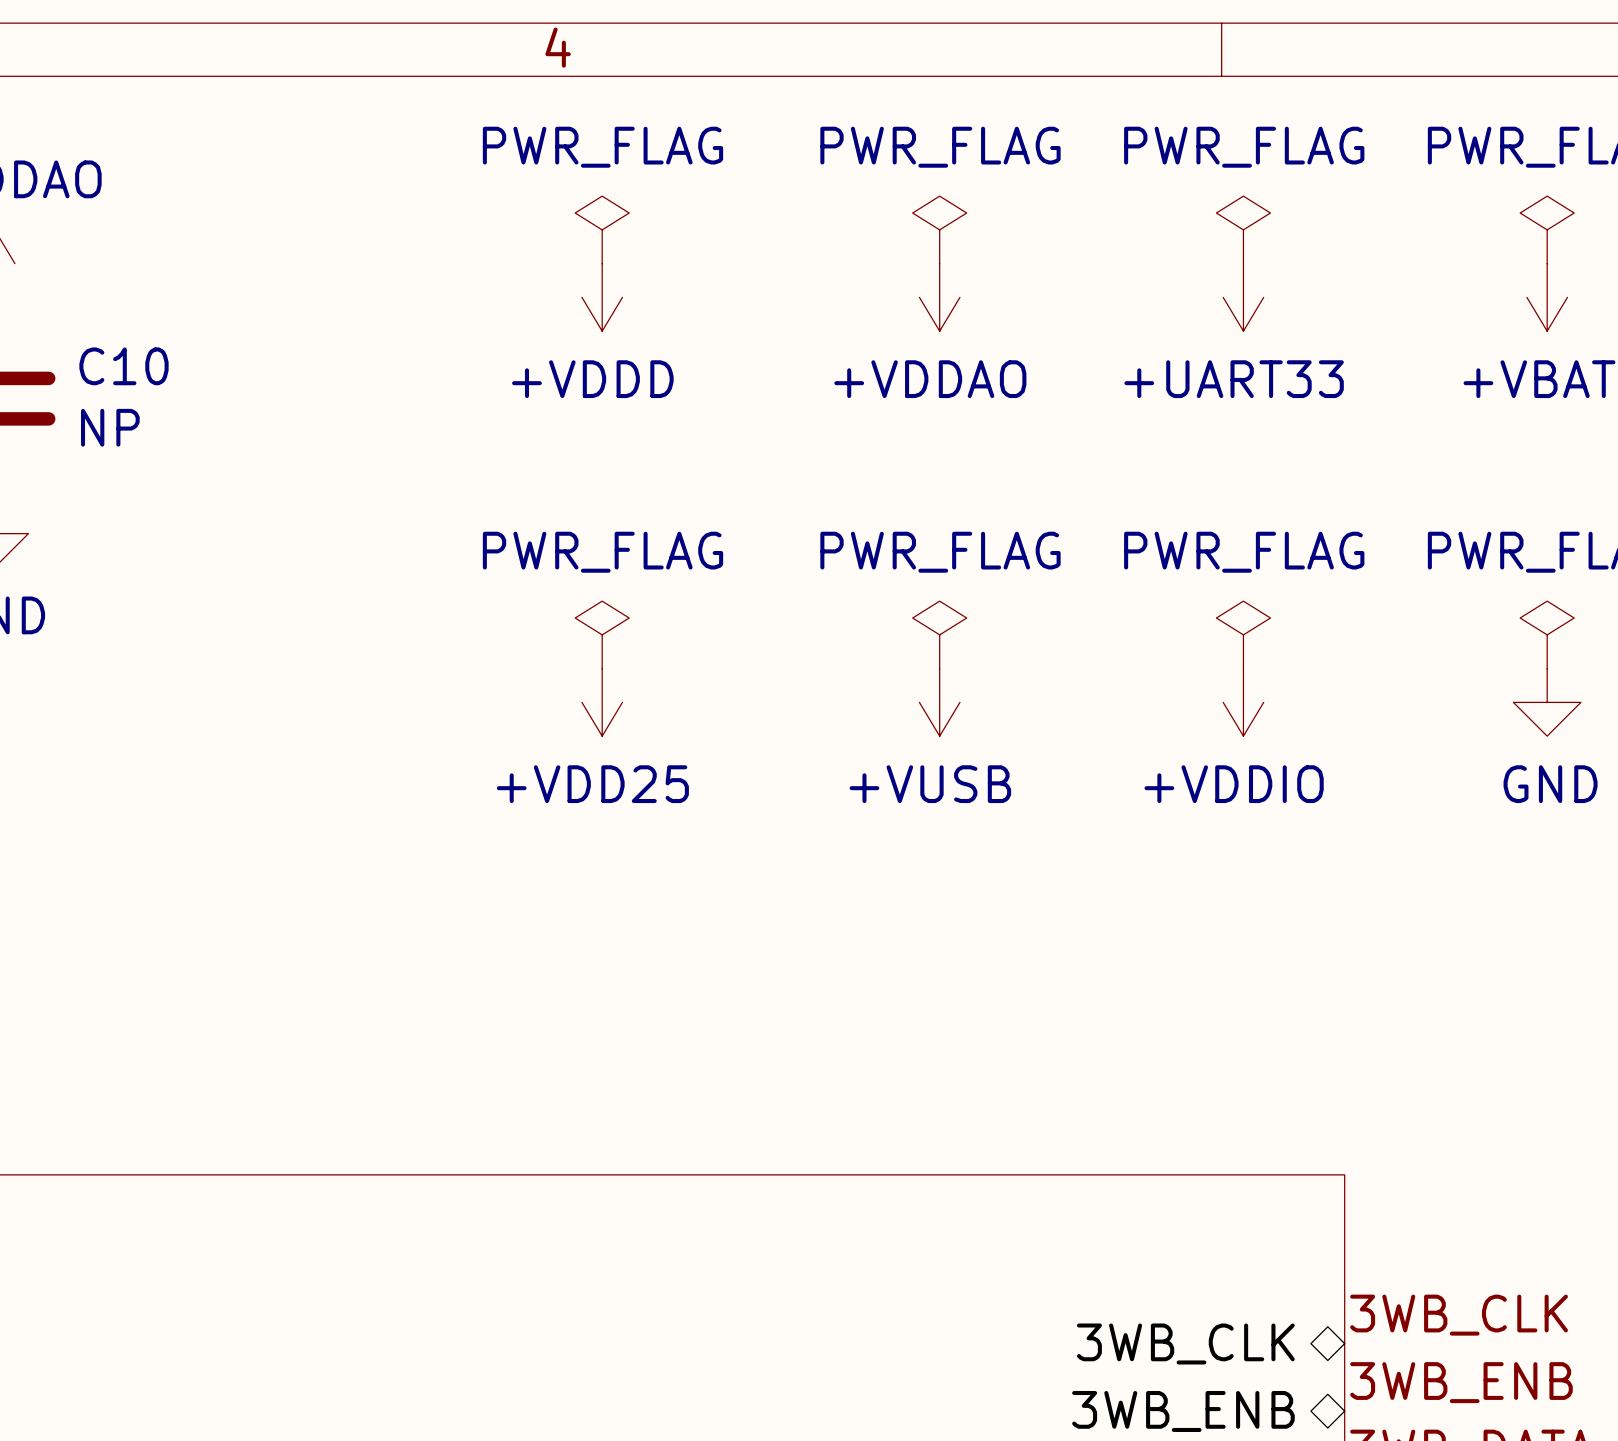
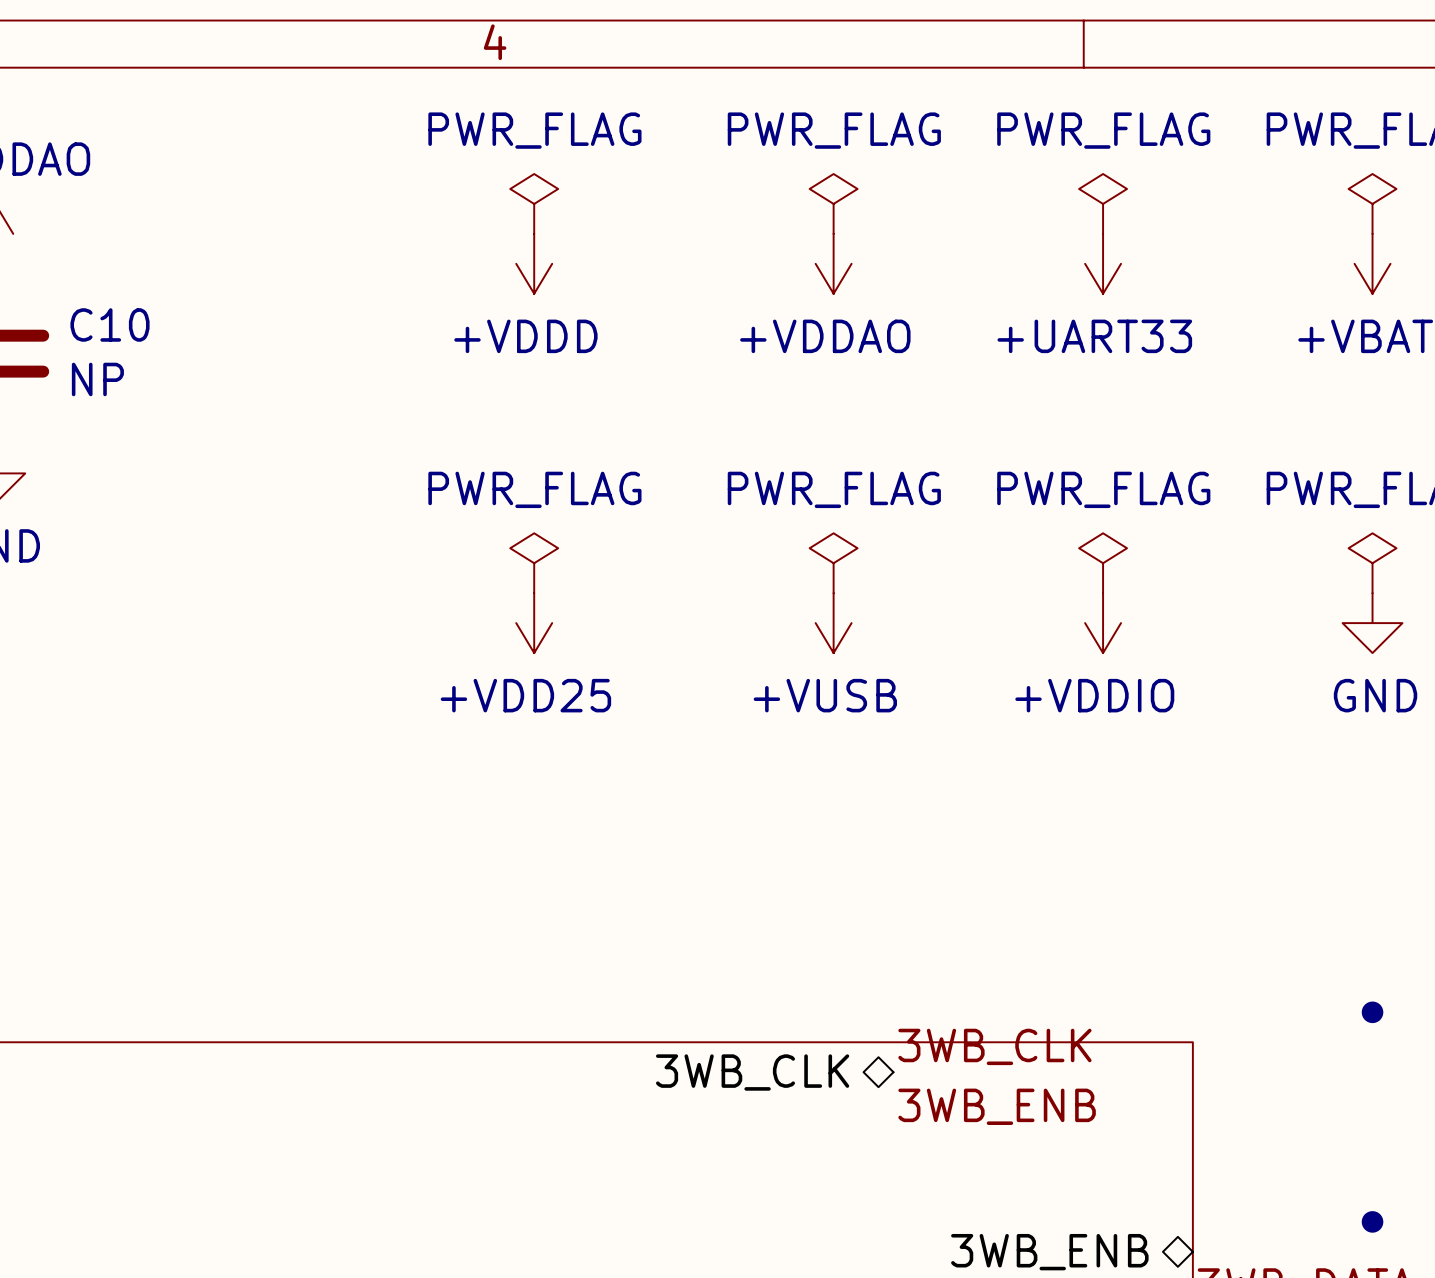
junction: none -> (1372, 1012)
label position: 3WB_CLK (1459, 1315) -> 3WB_CLK (994, 1046)
sheet pin position: 3WB_CLK (1185, 1343) -> 3WB_CLK (752, 1072)
junction: none -> (1372, 1221)
label position: 3WB_ENB (1461, 1382) -> 3WB_ENB (997, 1106)

